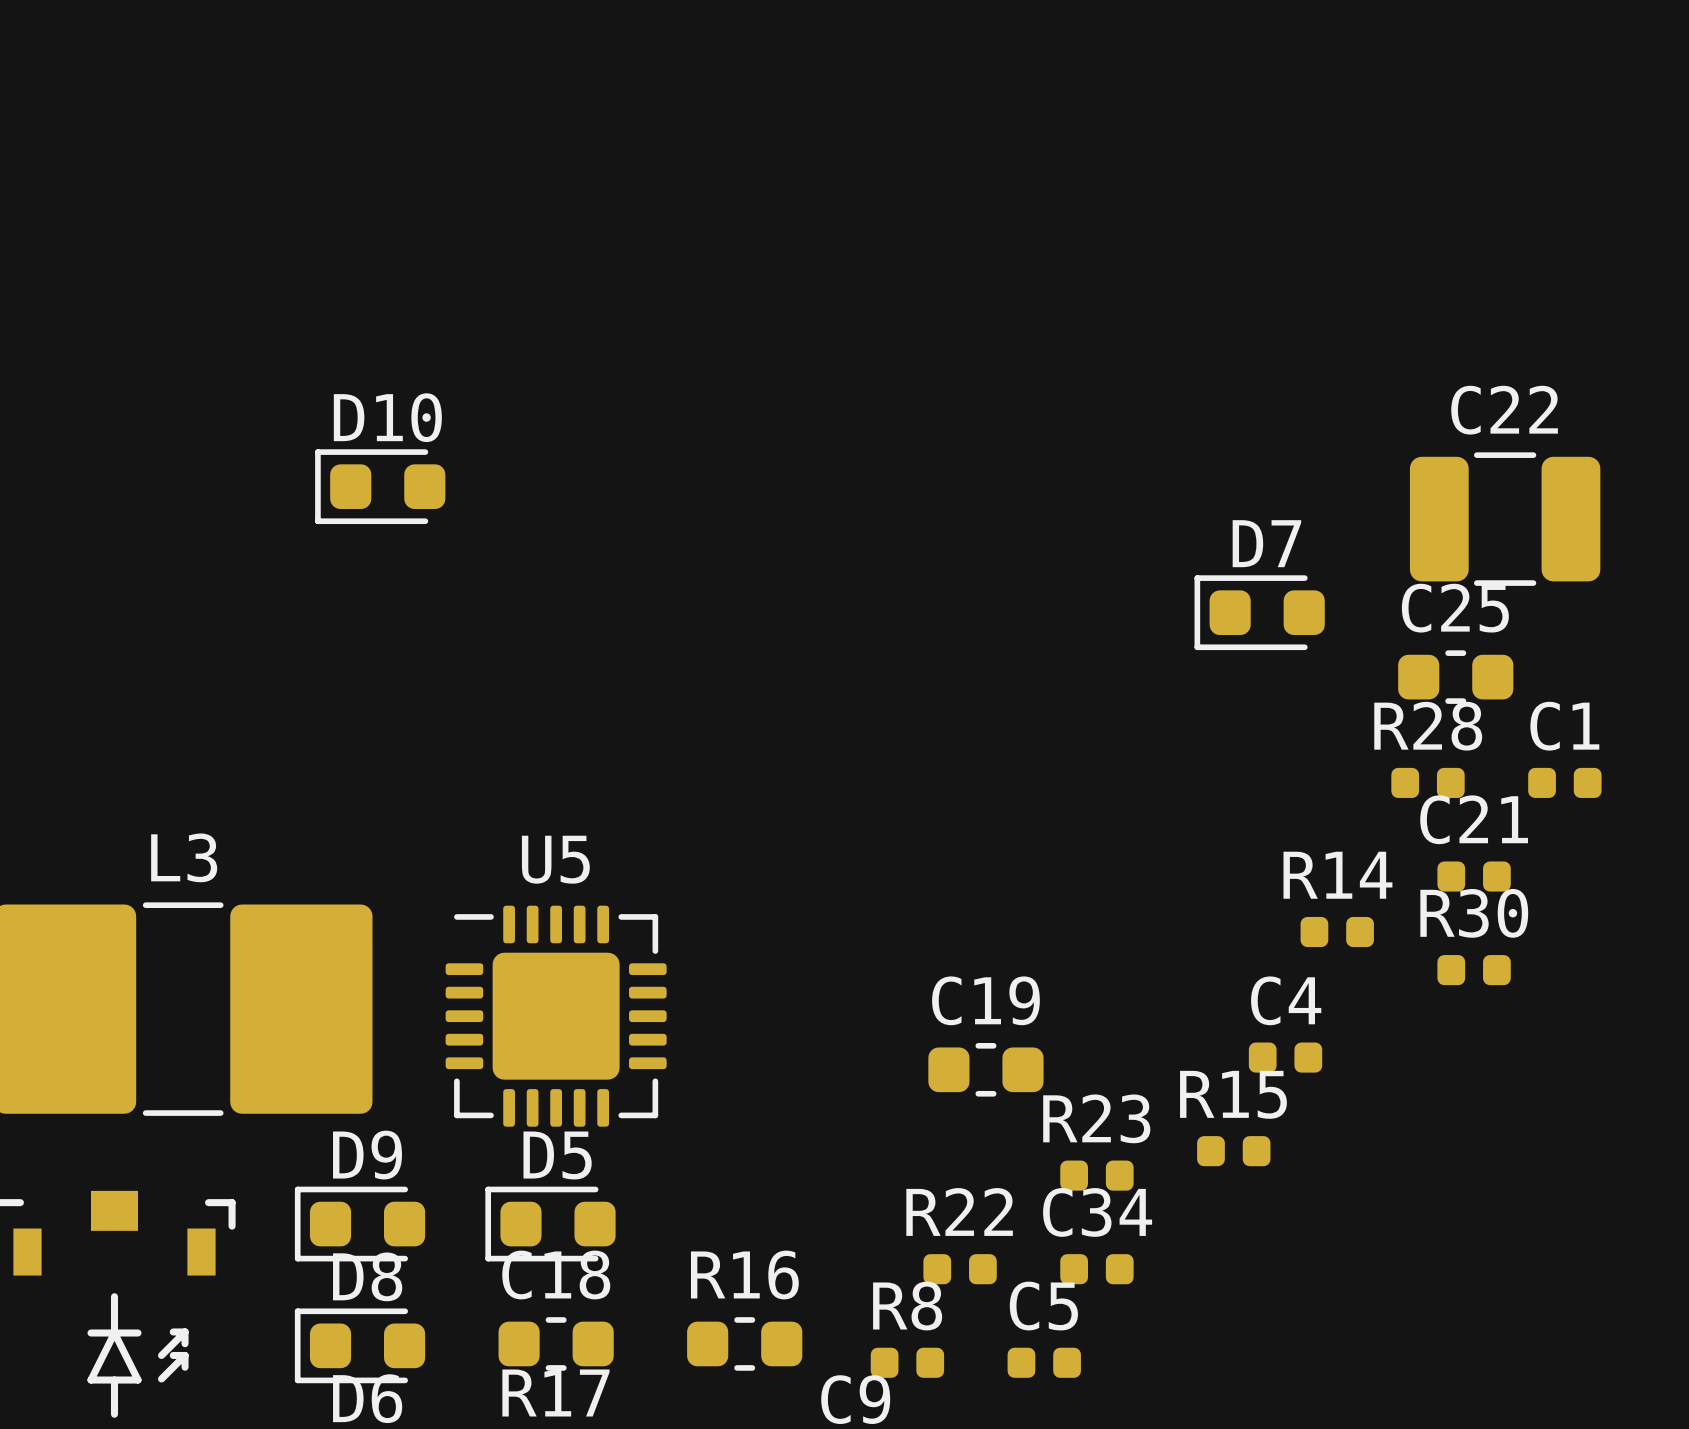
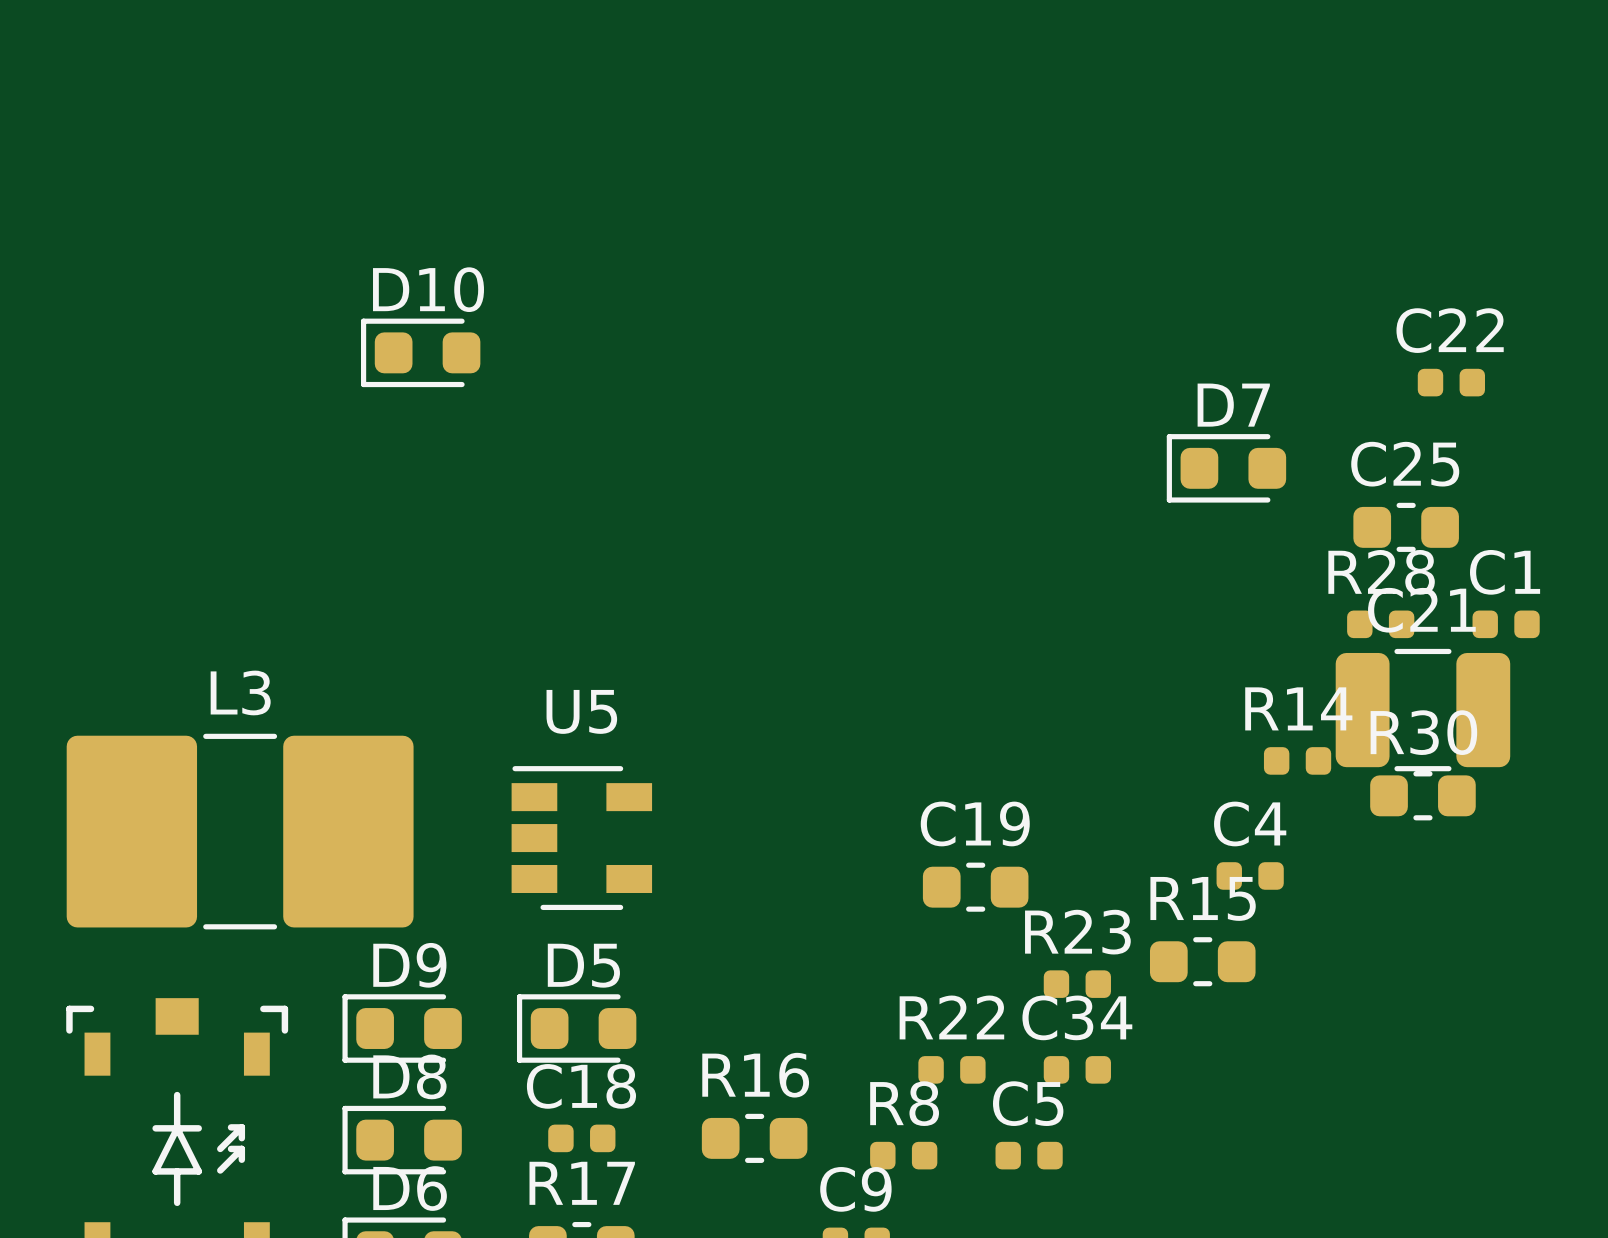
C22 footprint: [1409, 452, 1601, 586] -> [1417, 368, 1486, 397]
C21 footprint: [1437, 861, 1511, 892] -> [1335, 648, 1511, 772]
U5 footprint: [445, 905, 667, 1127] -> [511, 766, 653, 911]
R30 footprint: [1437, 955, 1511, 986] -> [1370, 771, 1476, 821]
R15 footprint: [1197, 1136, 1271, 1167] -> [1149, 937, 1256, 987]
C18 footprint: [498, 1317, 614, 1371] -> [548, 1124, 616, 1153]

